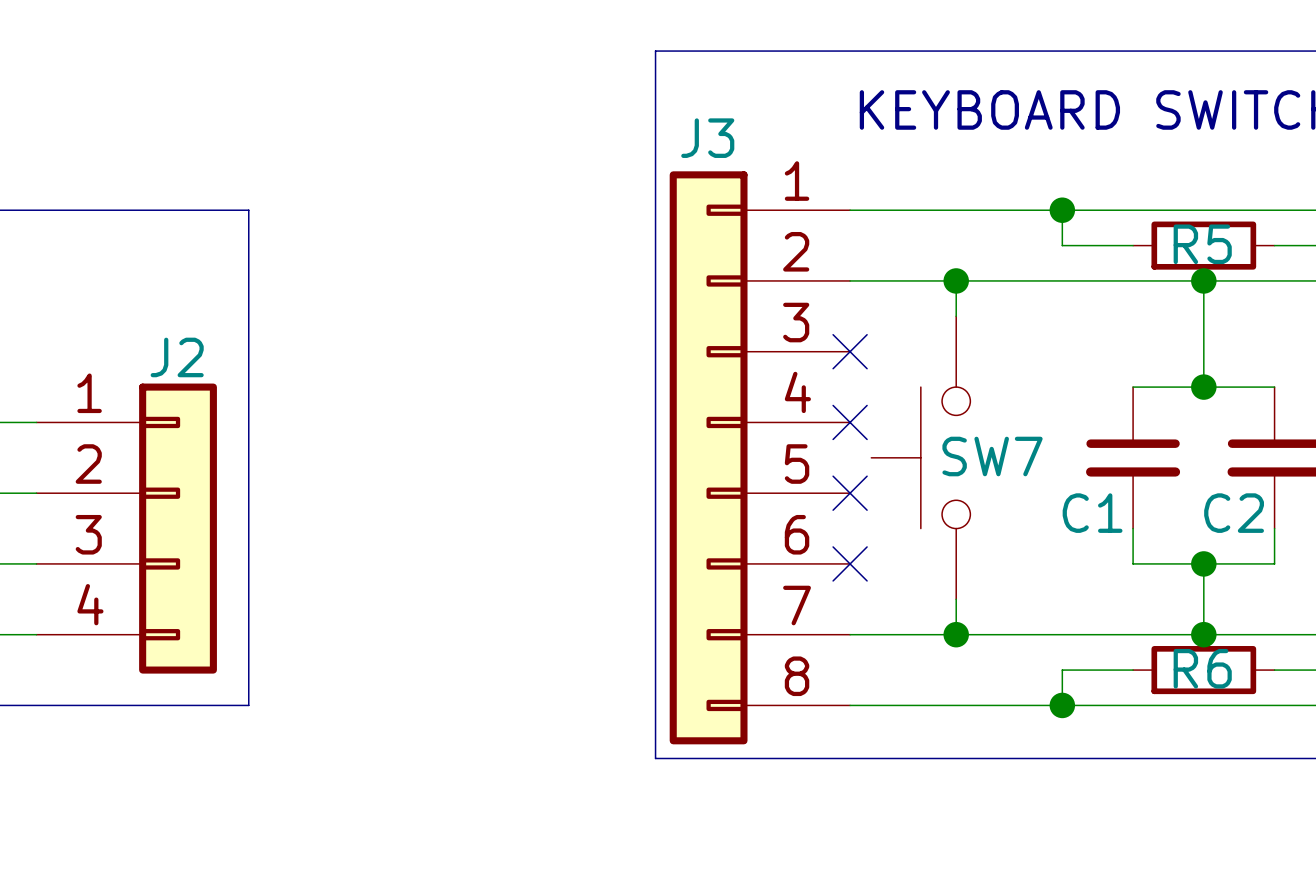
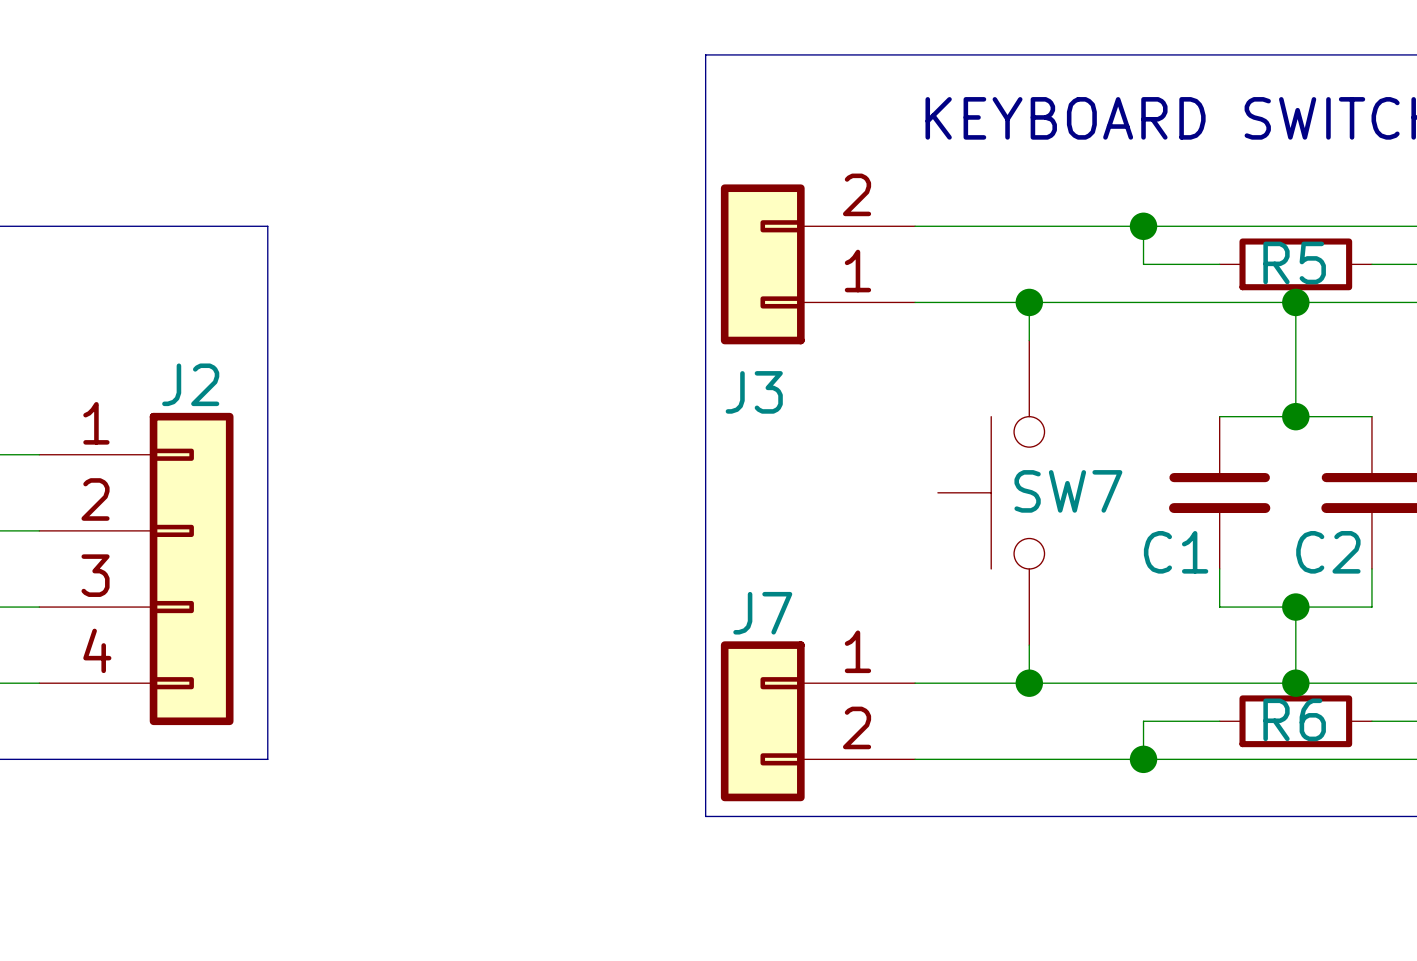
J3 name position: J3 (707, 138) -> J3 (754, 392)
J3 symbol: [669, 171, 851, 745] -> [720, 184, 916, 345]
no-connect mark: (850, 351) -> none
no-connect mark: (850, 422) -> none
no-connect mark: (850, 493) -> none
no-connect mark: (850, 563) -> none
J7: none -> (817, 721)

